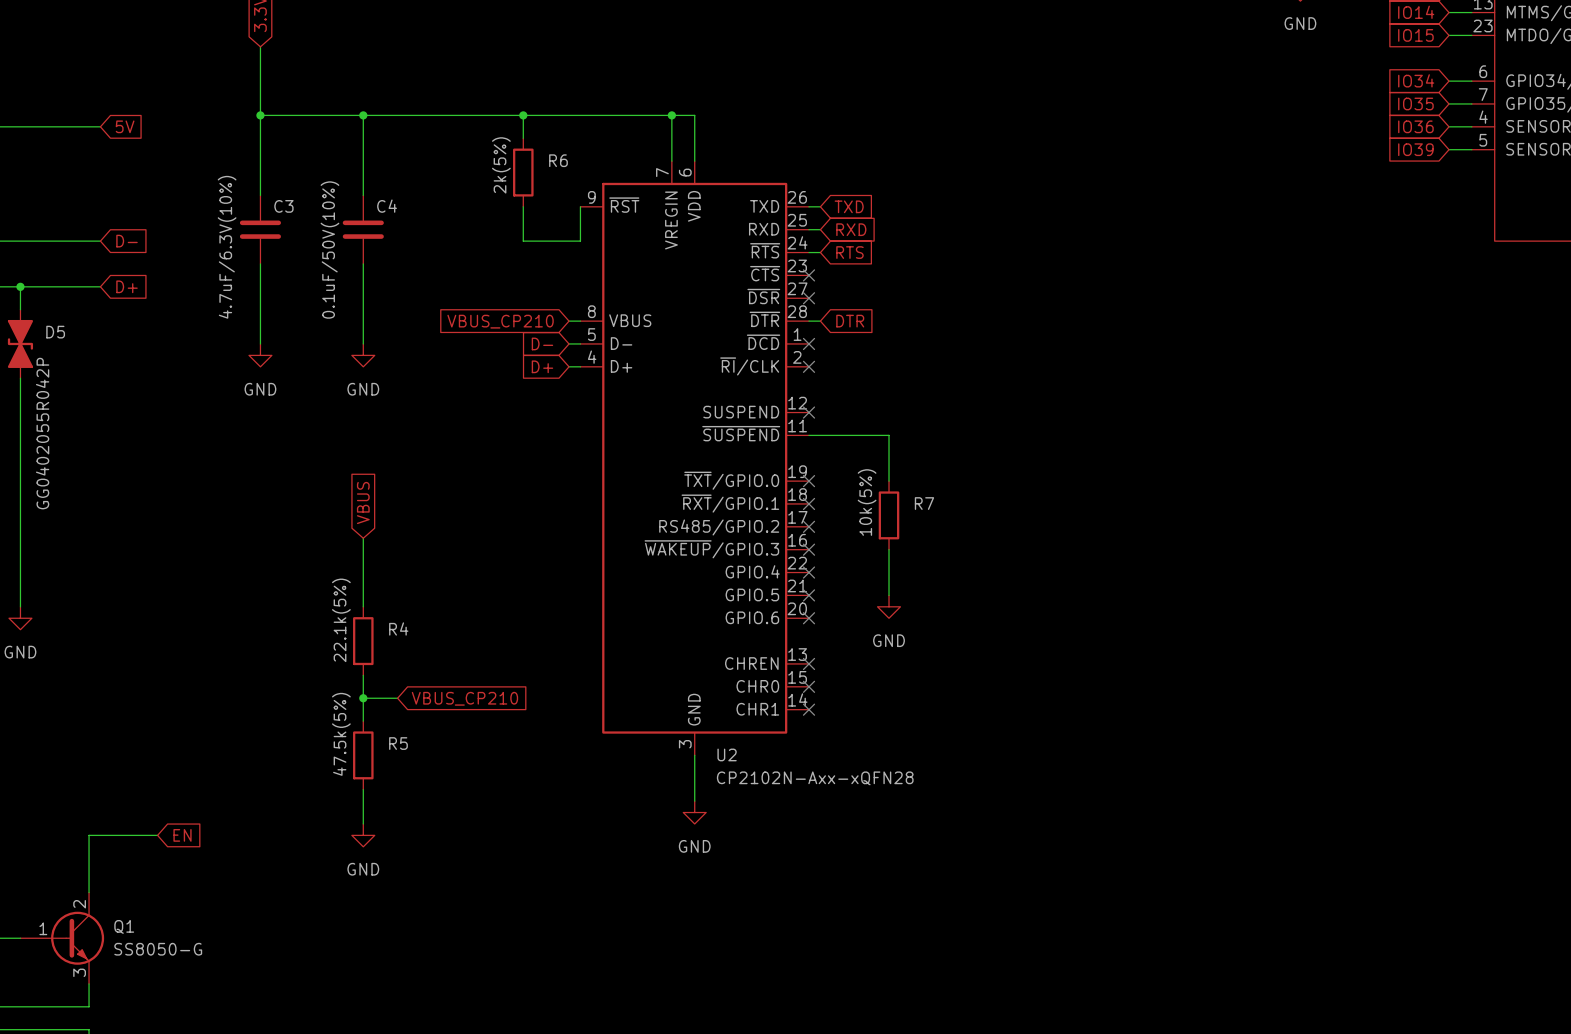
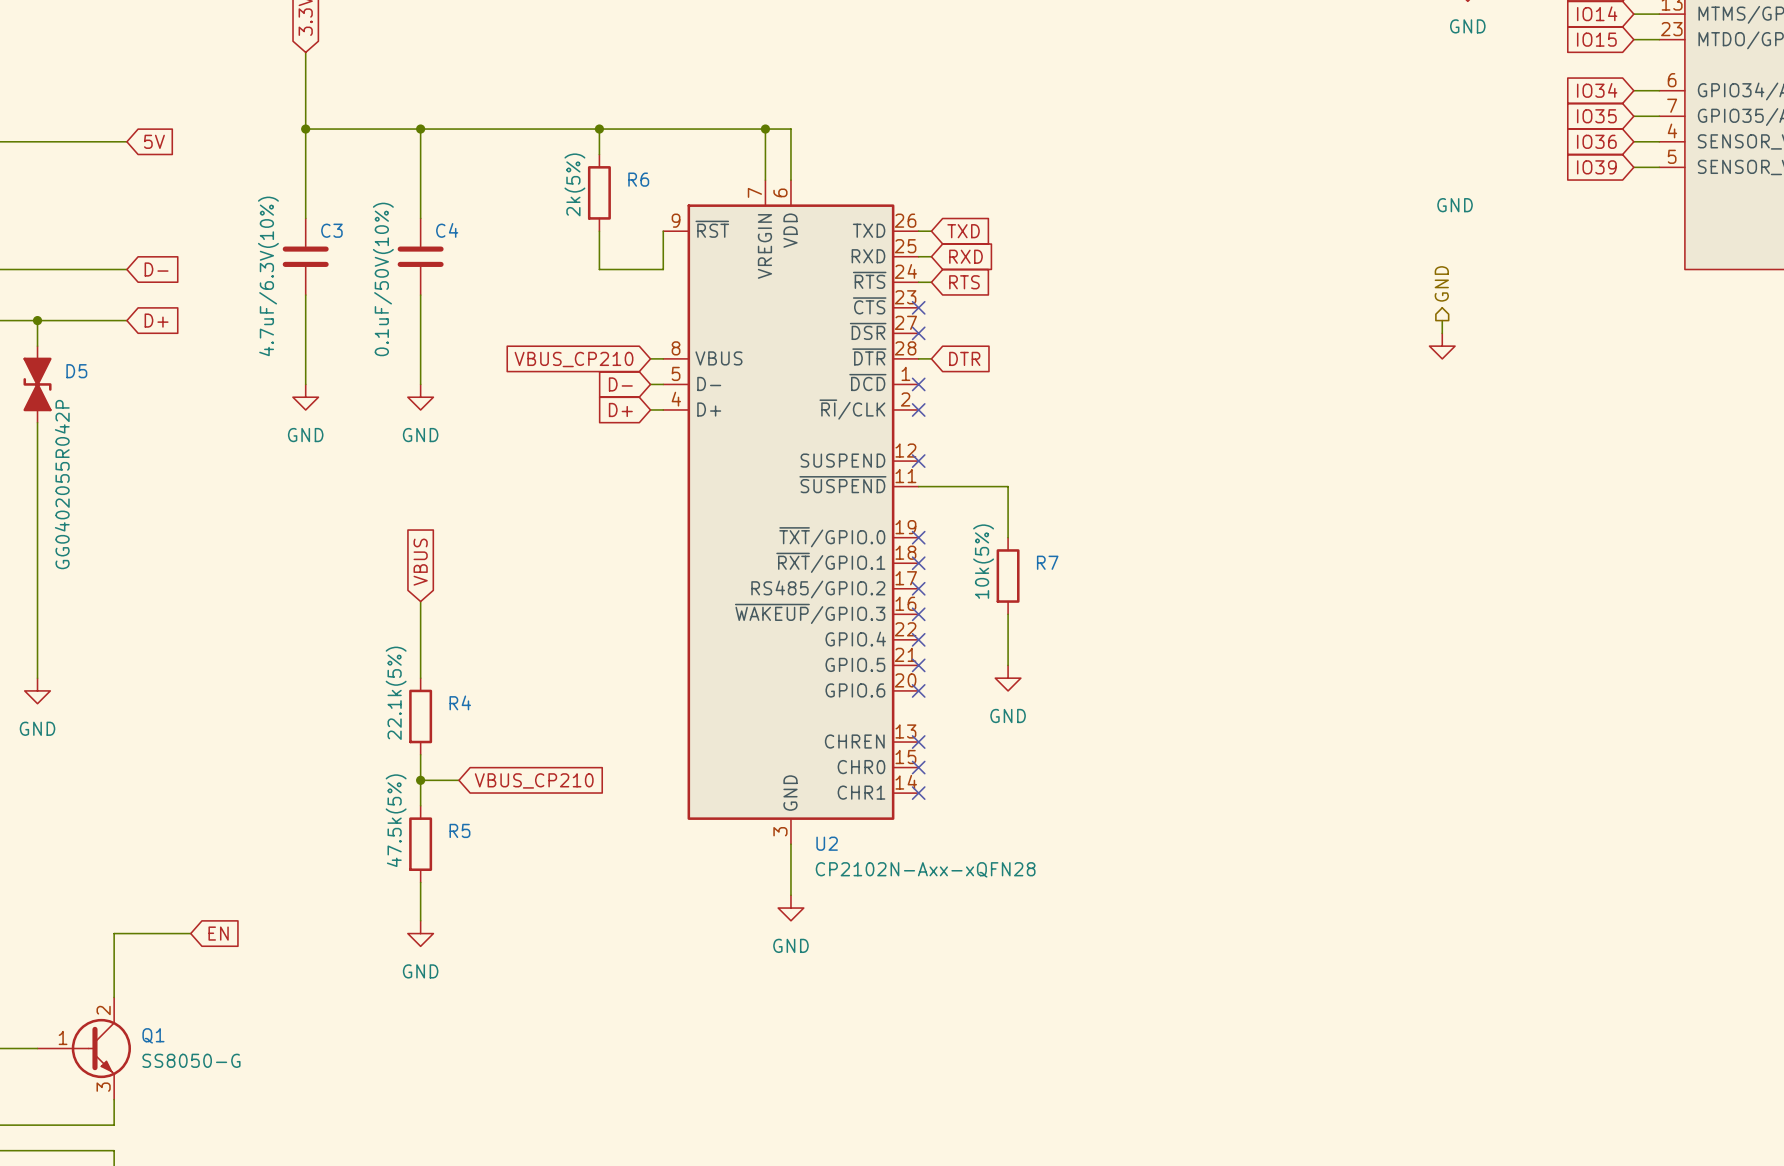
hierarchical label: none -> GND (1441, 283)
wire: none -> (1442, 320) (1442, 333)
power symbol: none -> GND (1442, 346)

